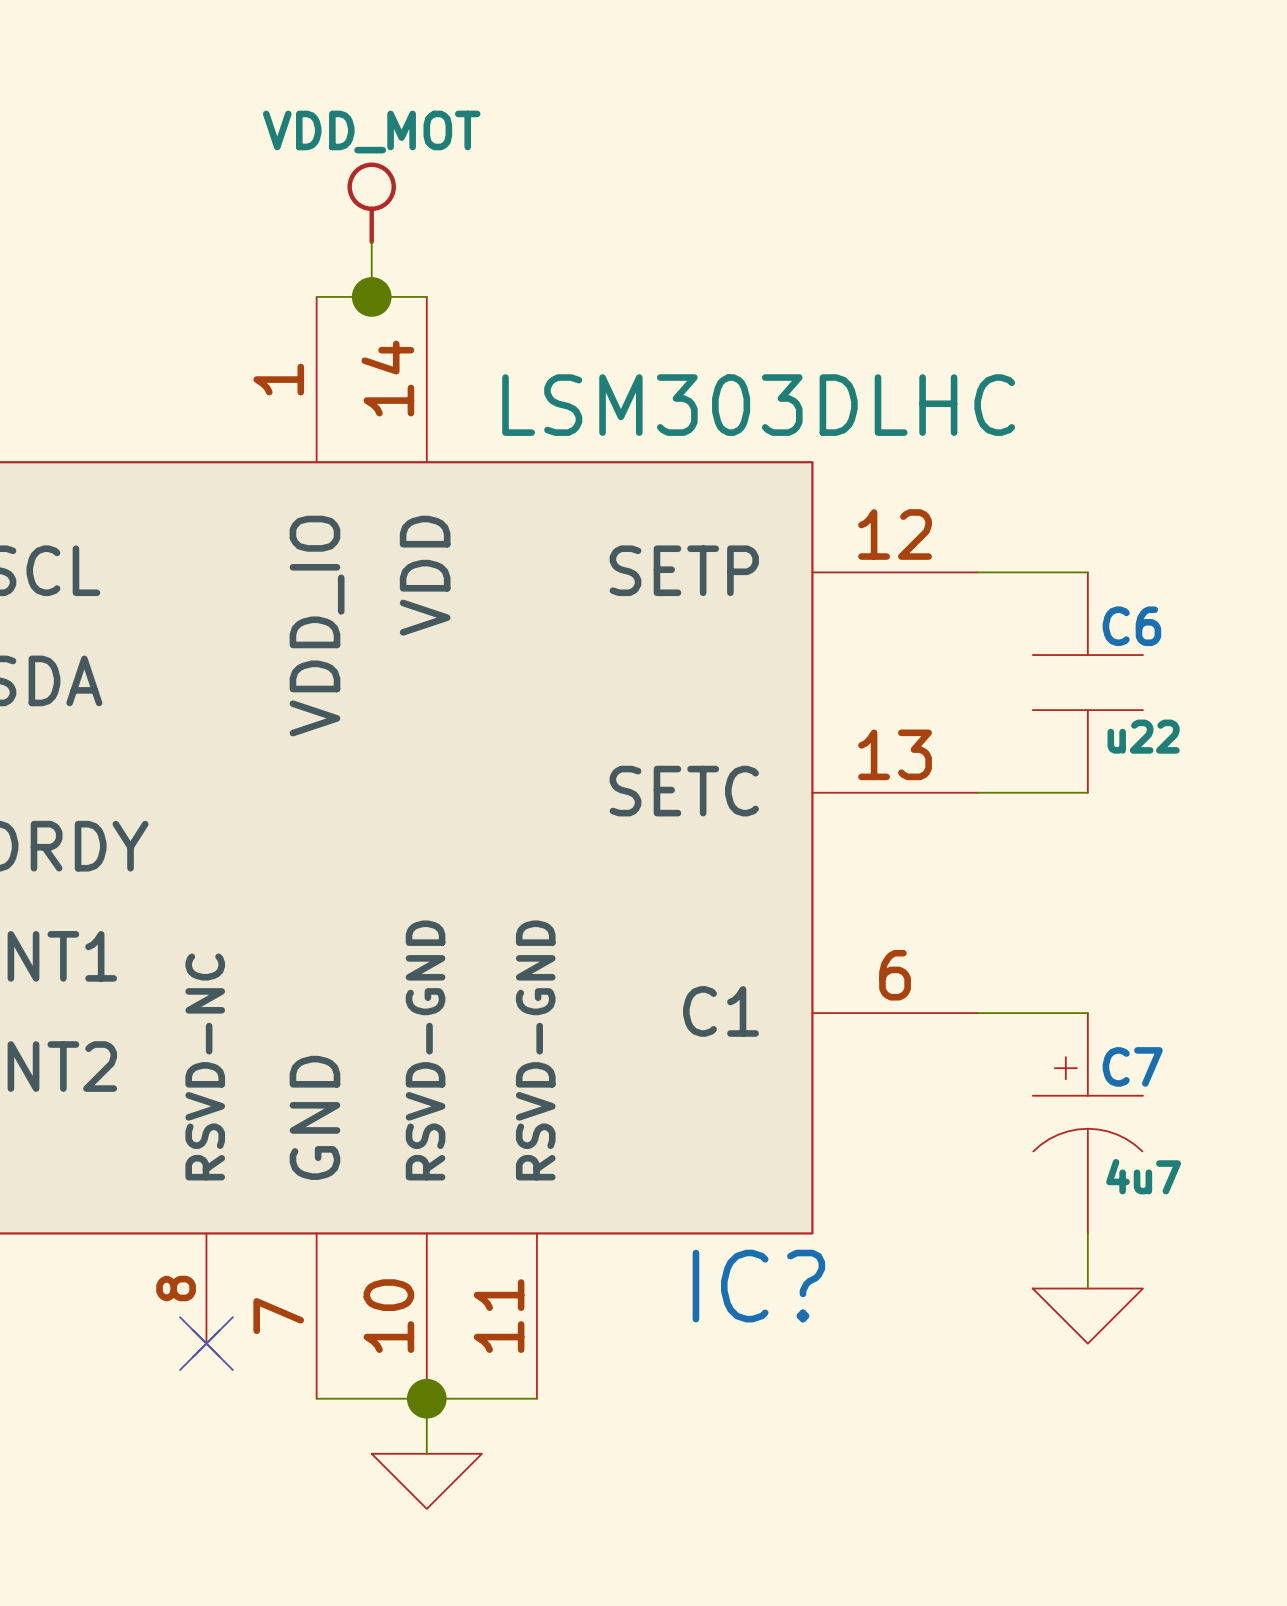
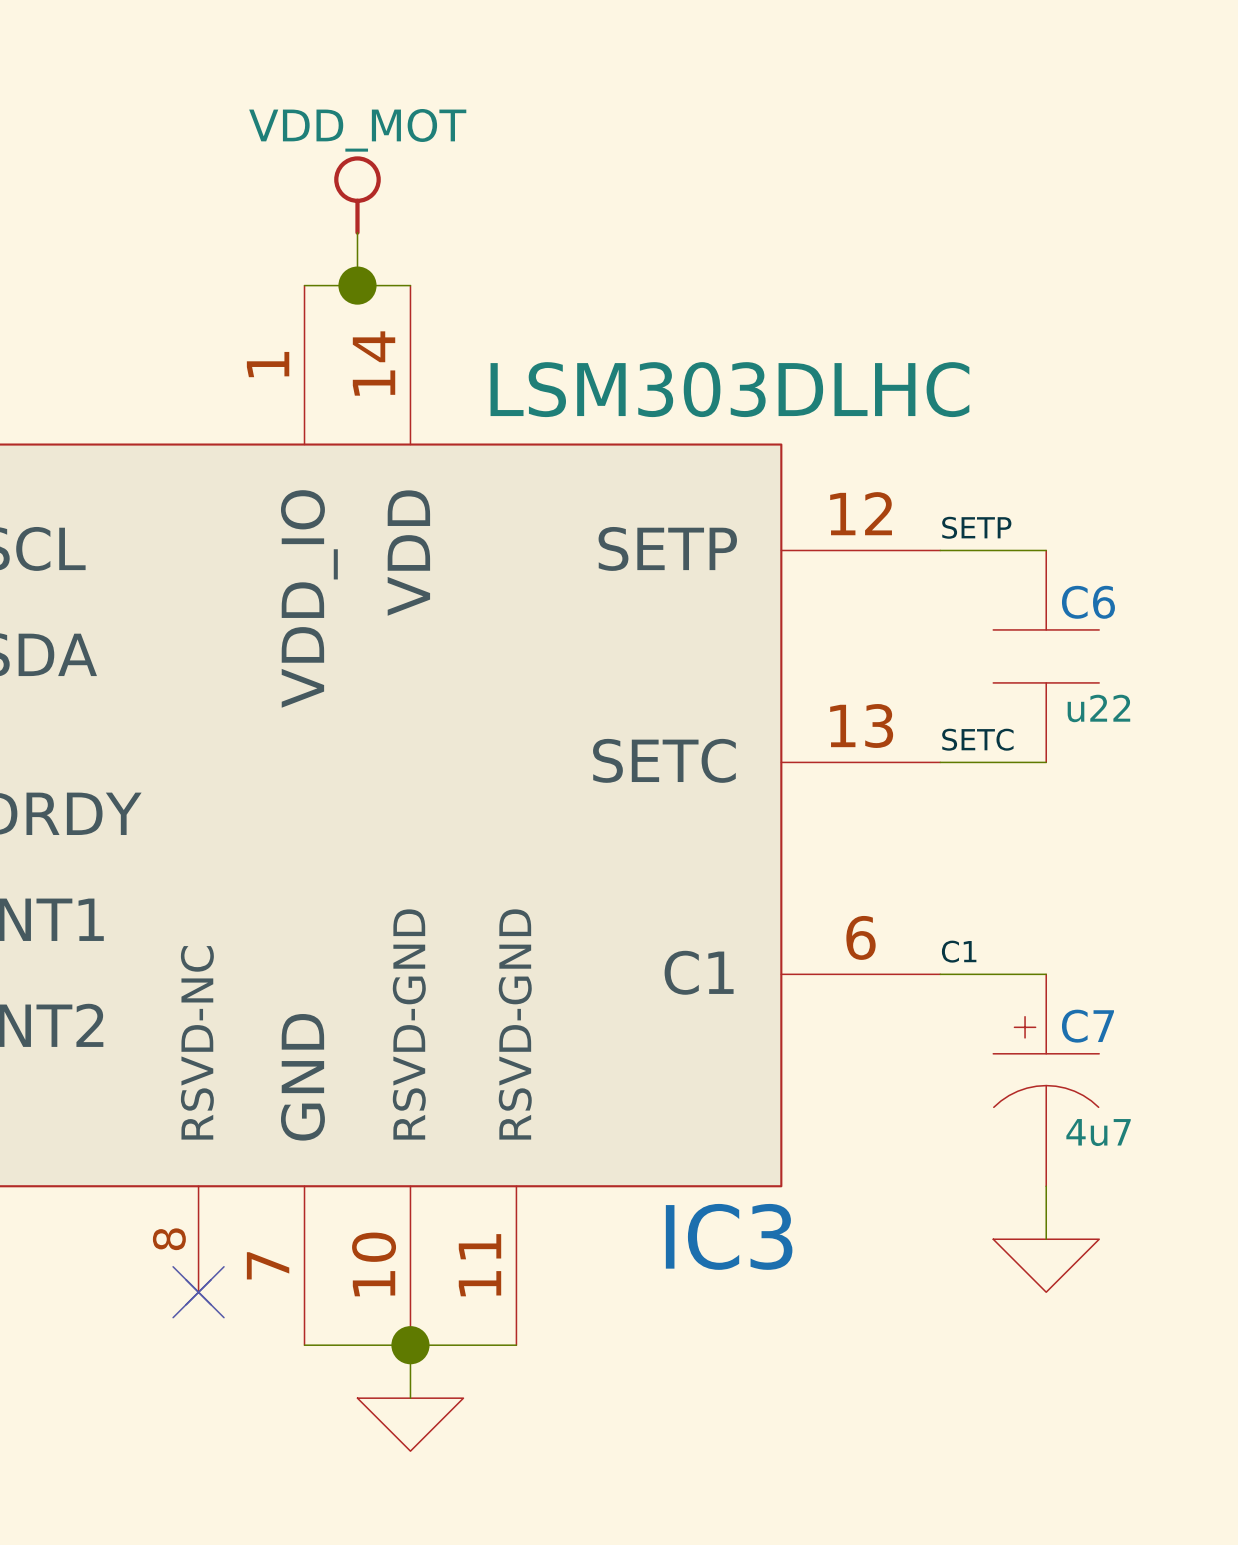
label: none -> SETP (976, 527)
label: none -> SETC (977, 739)
label: none -> C1 (959, 951)
IC? name: IC? (758, 1286) -> IC3 (729, 1236)

